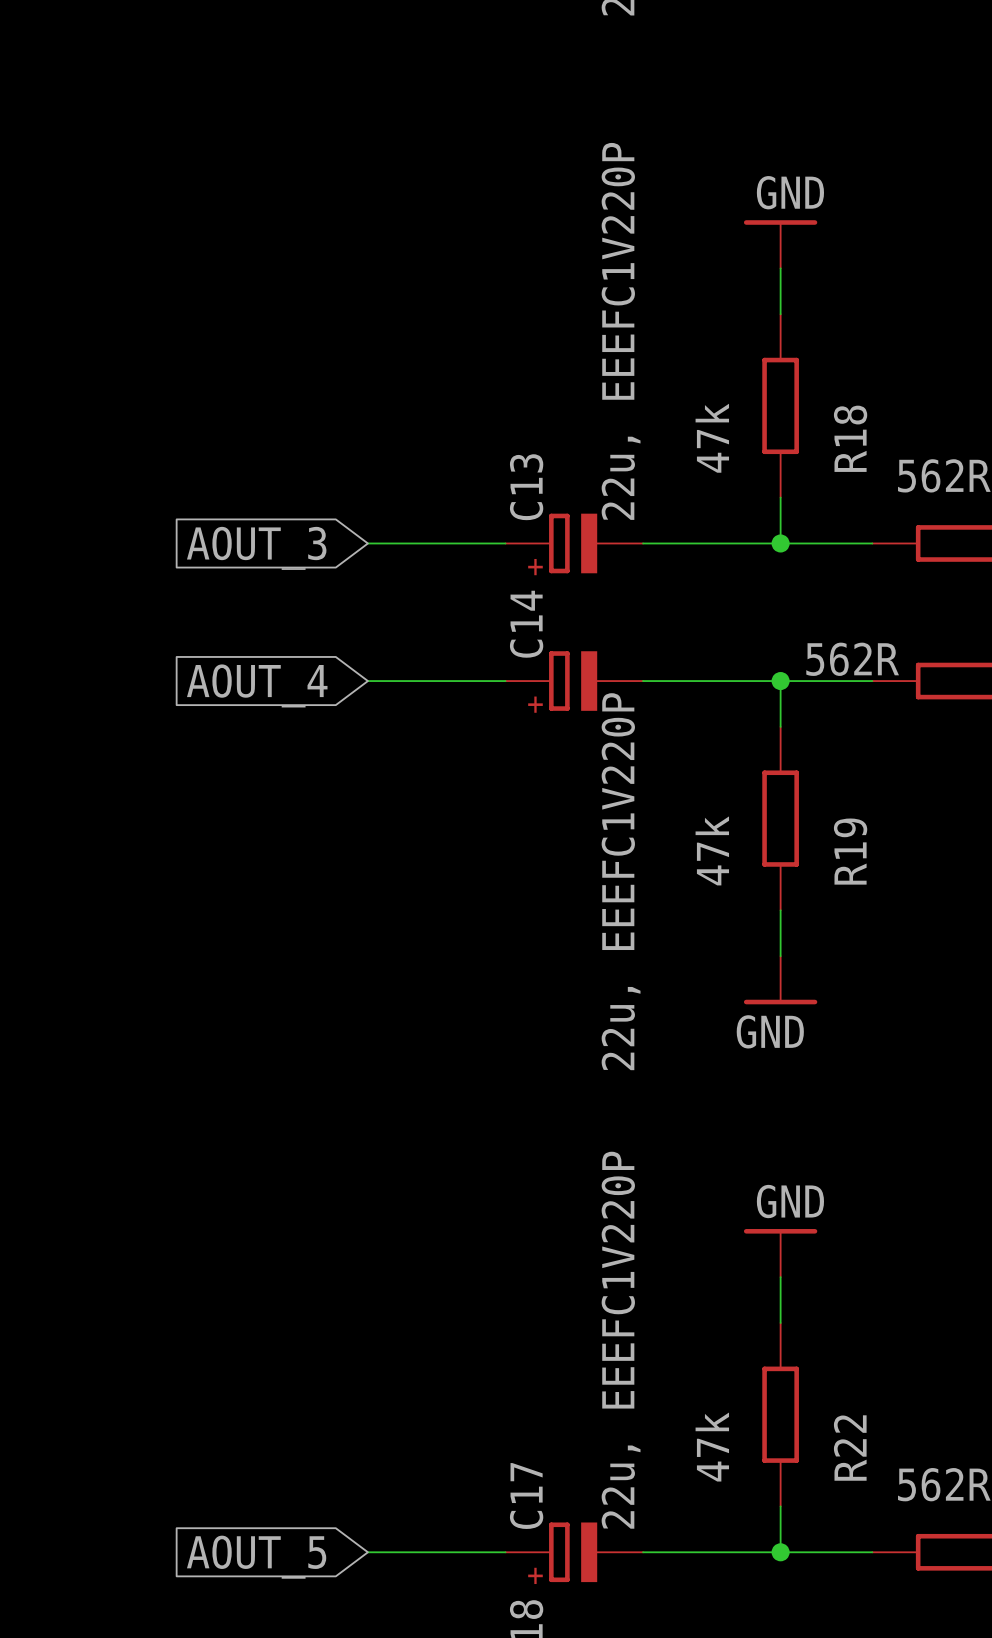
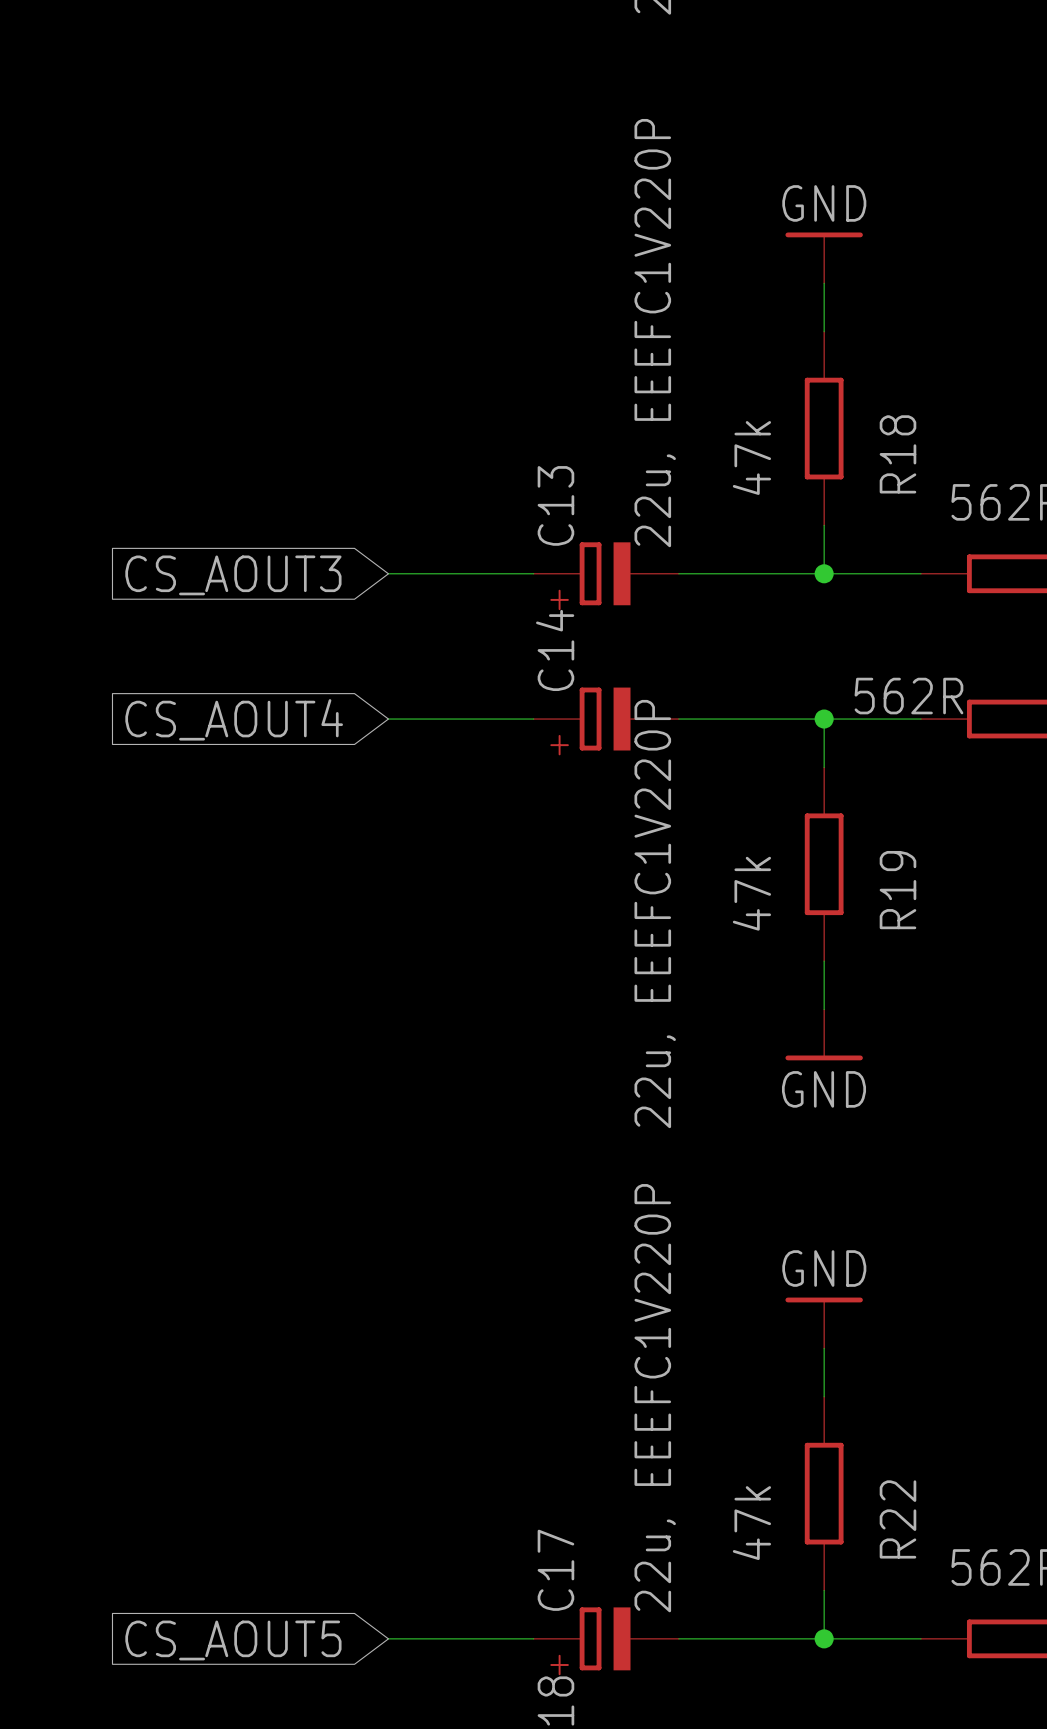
global label: AOUT_3 (256, 548) -> CS_AOUT3 (233, 575)
global label: AOUT_4 (257, 685) -> CS_AOUT4 (234, 719)
global label: AOUT_5 (256, 1557) -> CS_AOUT5 (233, 1640)

